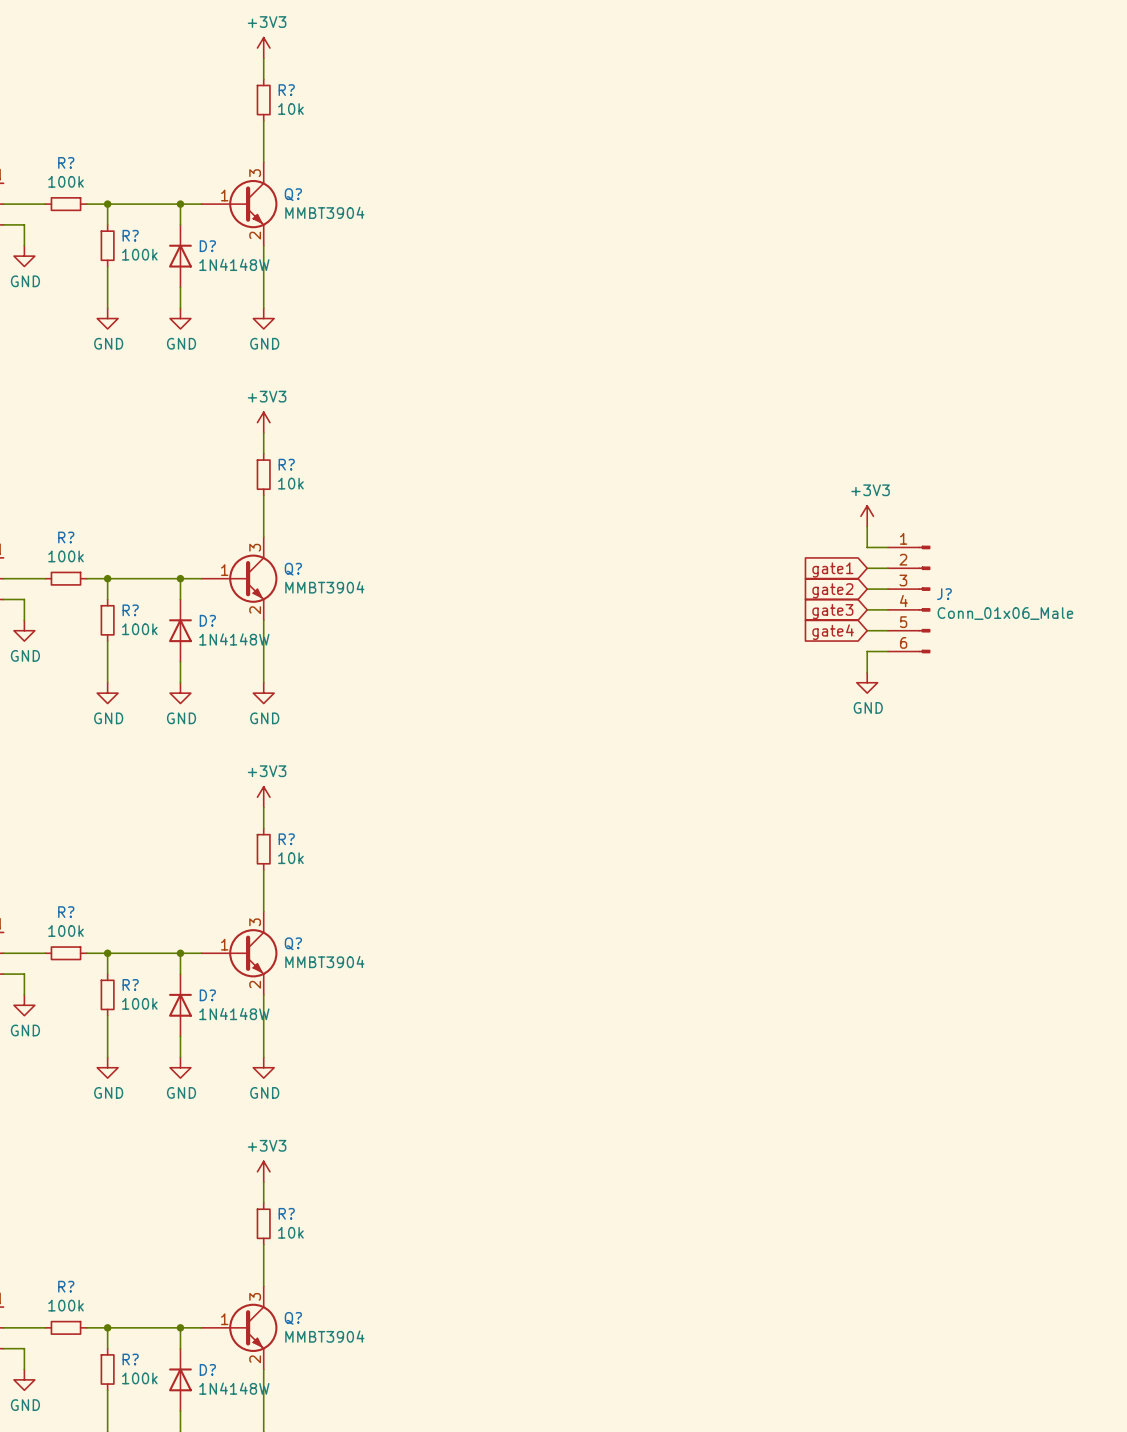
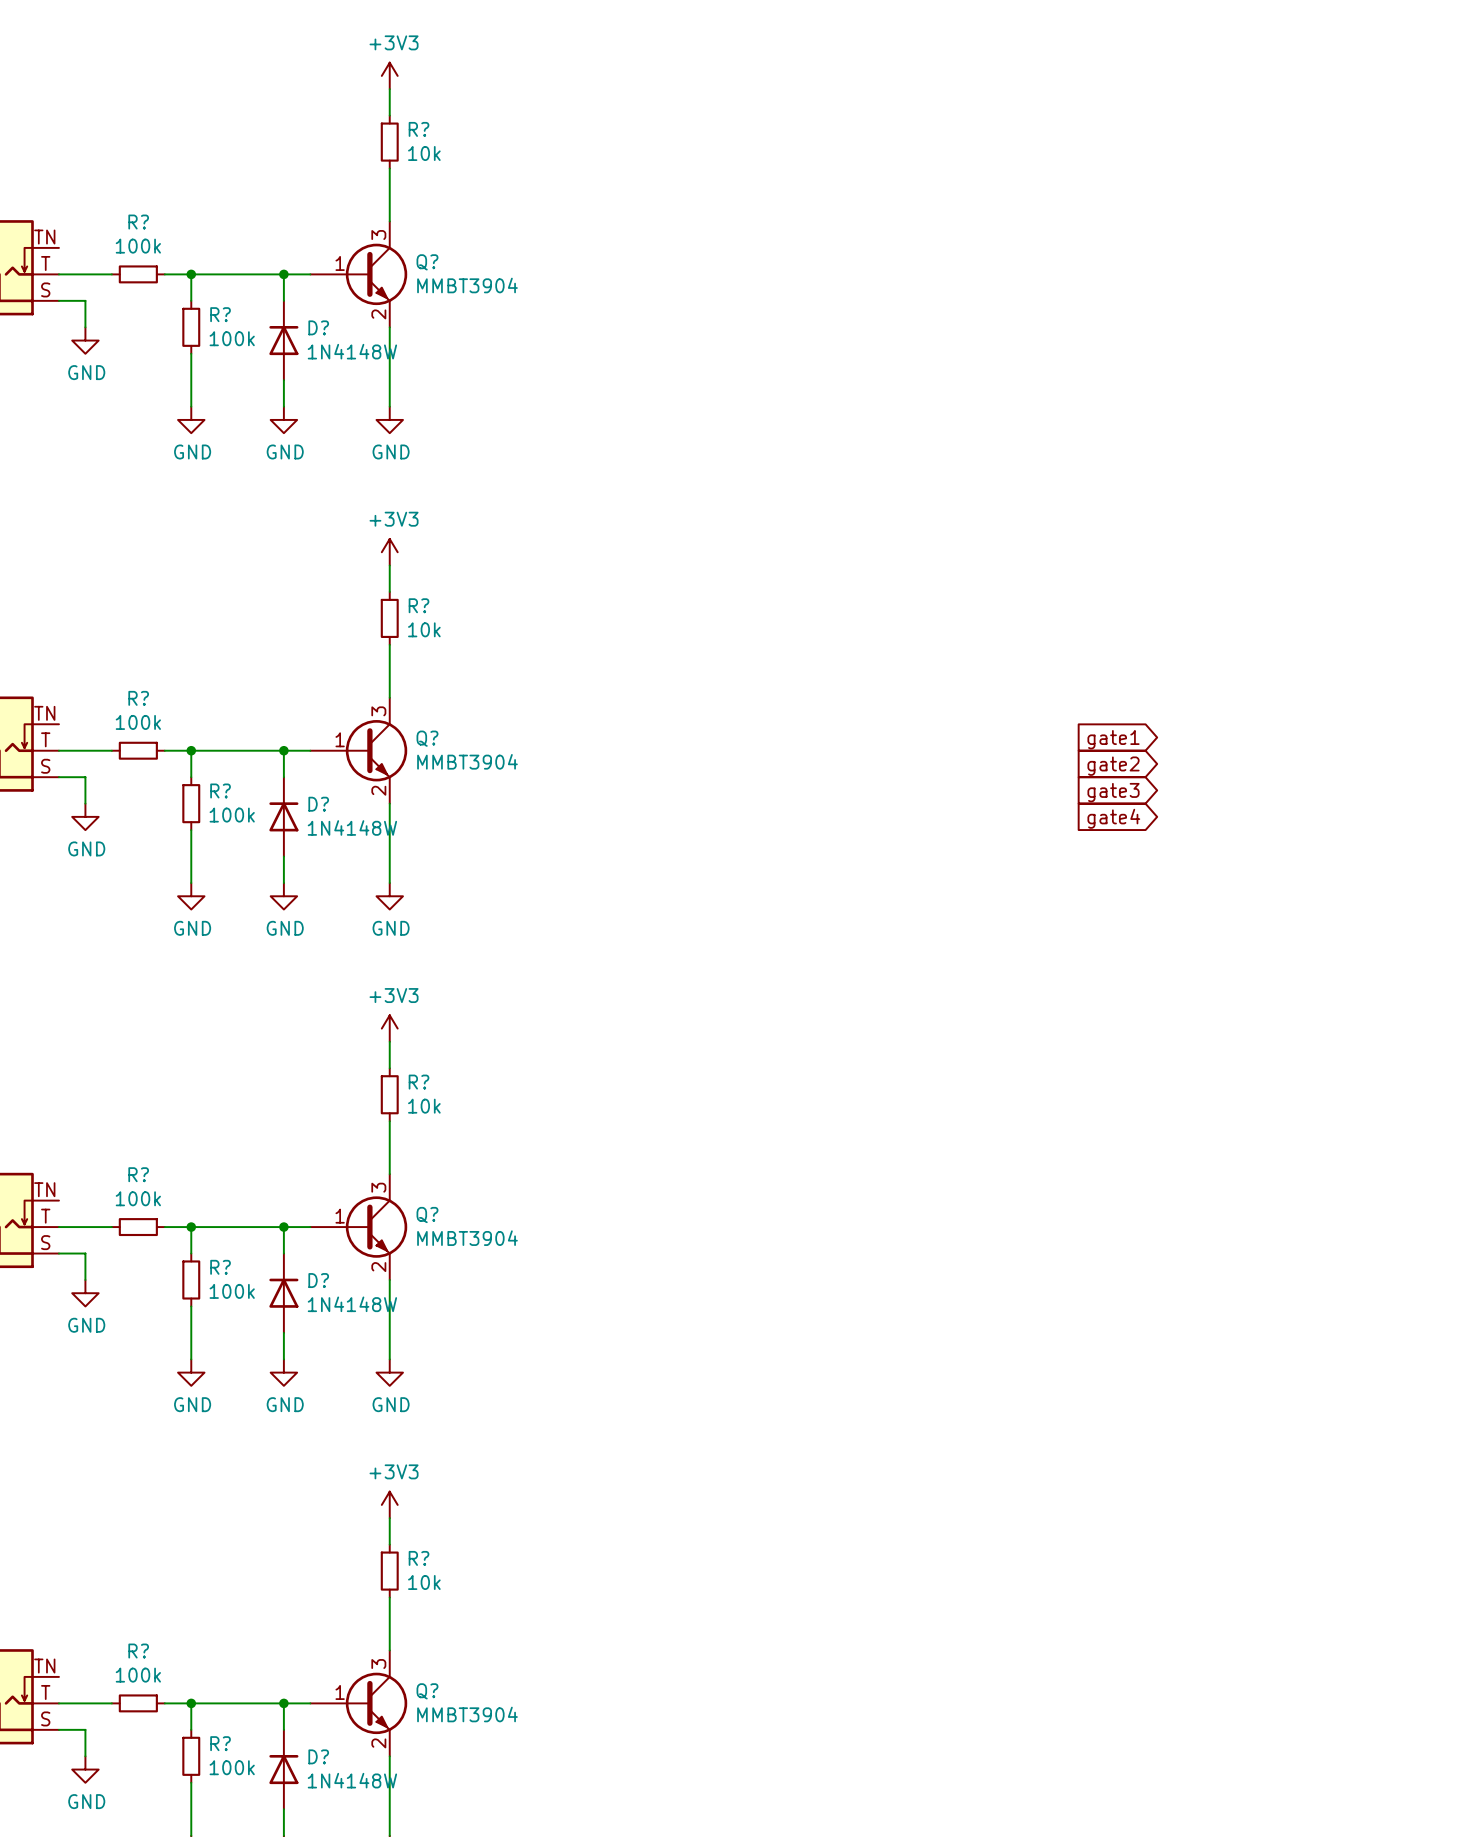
power symbol: +3V3 (867, 516) -> none
wire: (867, 526) (867, 547) (888, 547) -> none
wire: (867, 568) (888, 568) -> none
wire: (867, 589) (888, 589) -> none
J?: Conn_01x06_Male (909, 599) -> none
wire: (867, 609) (888, 609) -> none
wire: (867, 630) (888, 630) -> none
wire: (888, 651) (867, 651) (867, 672) -> none
power symbol: GND (867, 682) -> none

